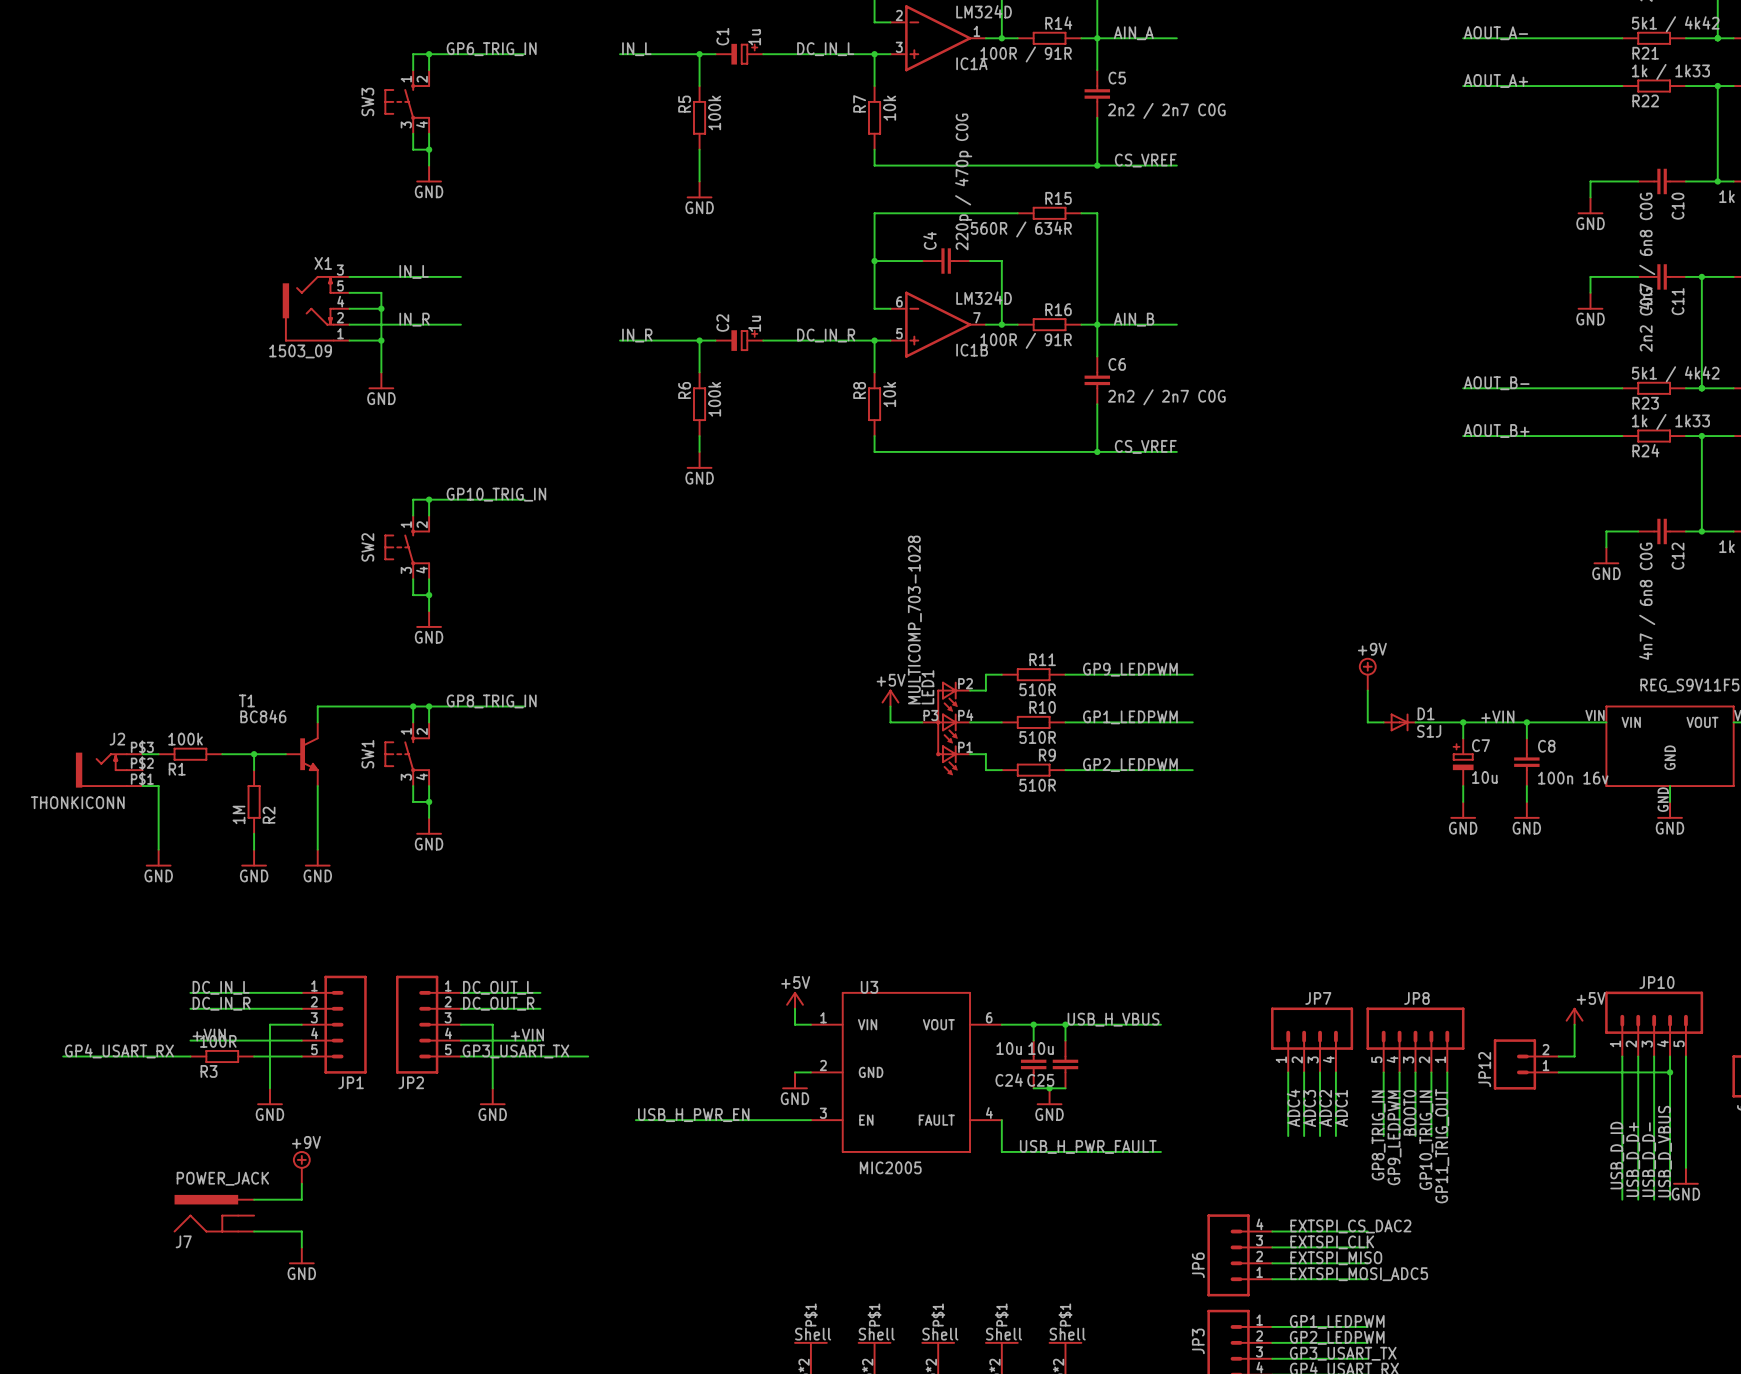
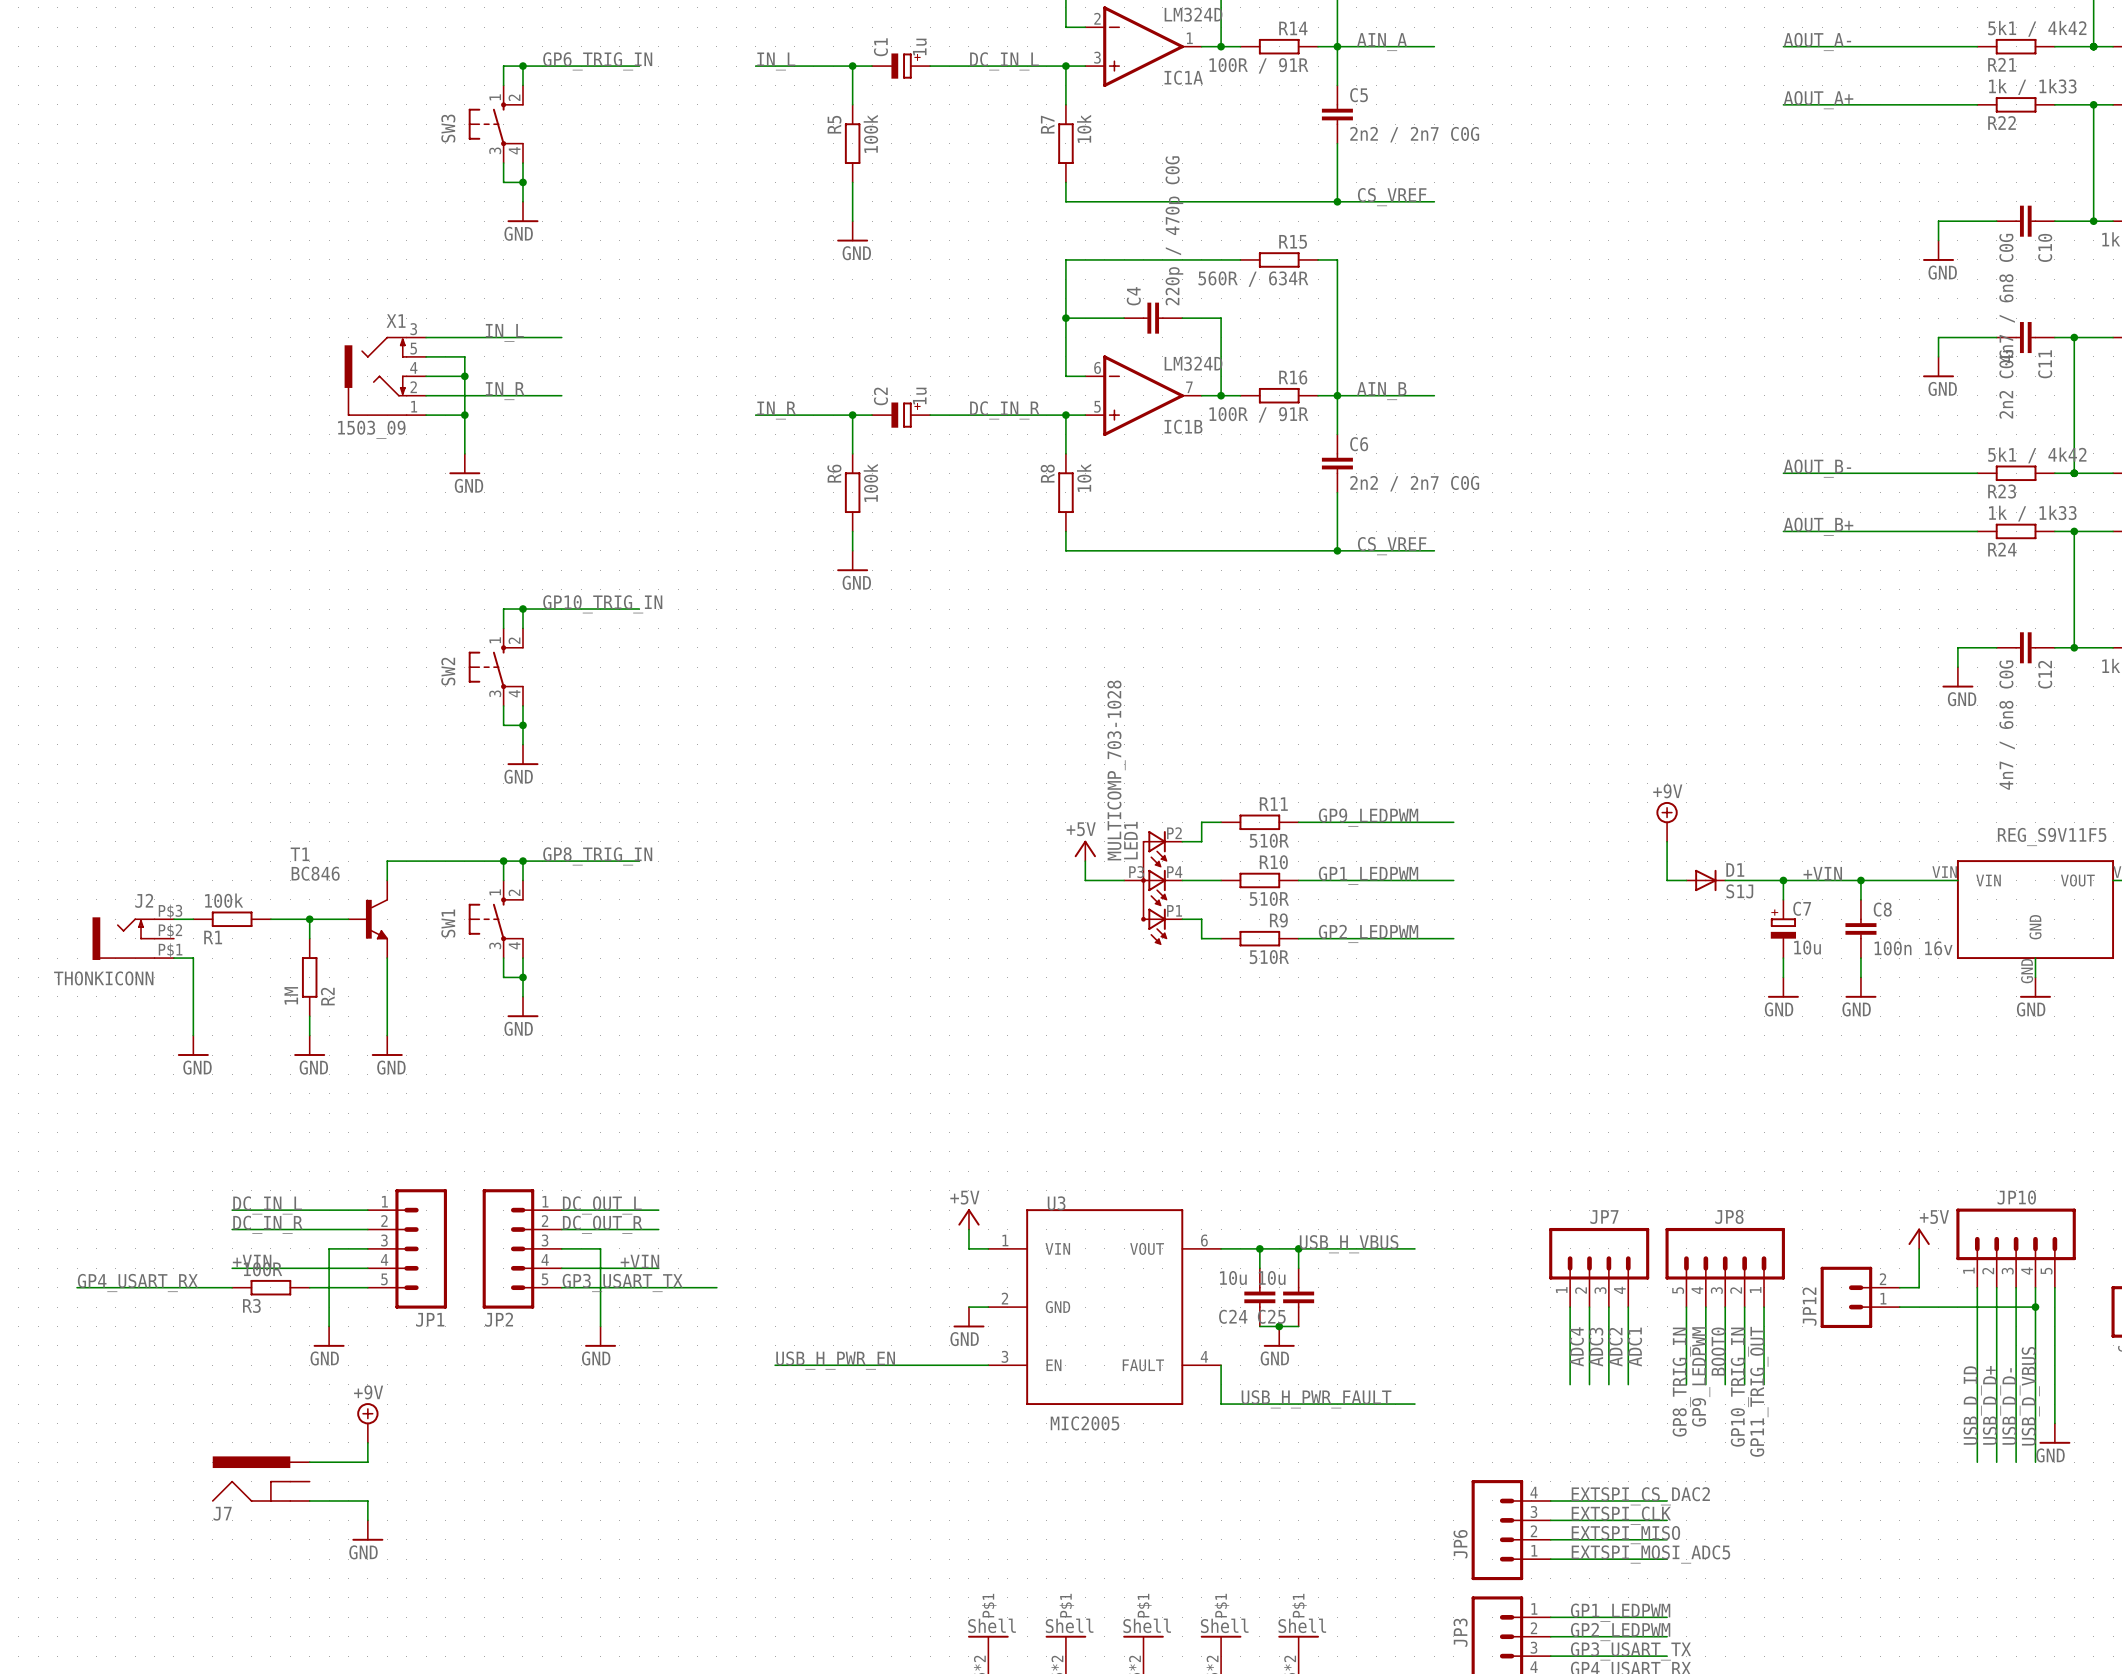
J7 value: POWER_JACK (222, 1178) -> none

